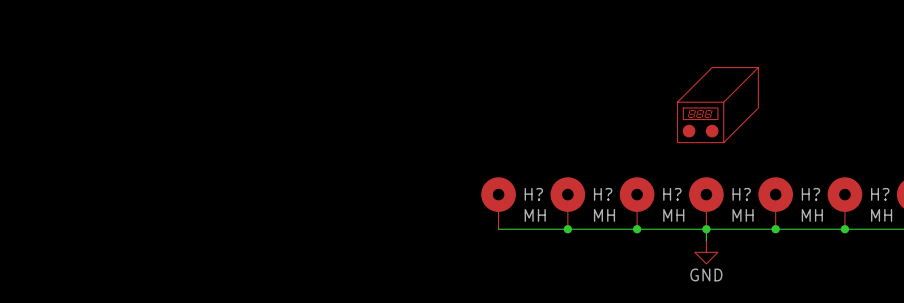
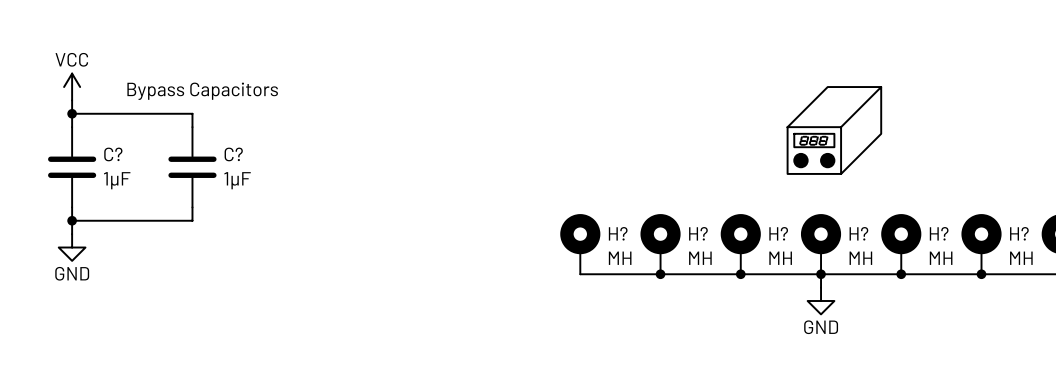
power symbol: none -> VCC (72, 87)
text: none -> Bypass Capacitors (202, 91)
wire: none -> (72, 100) (72, 127)
wire: none -> (72, 113) (192, 113) (192, 127)
junction: none -> (72, 113)
C?: none -> 1µF (72, 167)
C?: none -> 1µF (192, 167)
wire: none -> (72, 207) (72, 234)
wire: none -> (192, 207) (192, 220) (72, 220)
junction: none -> (72, 220)
power symbol: none -> GND (72, 247)

